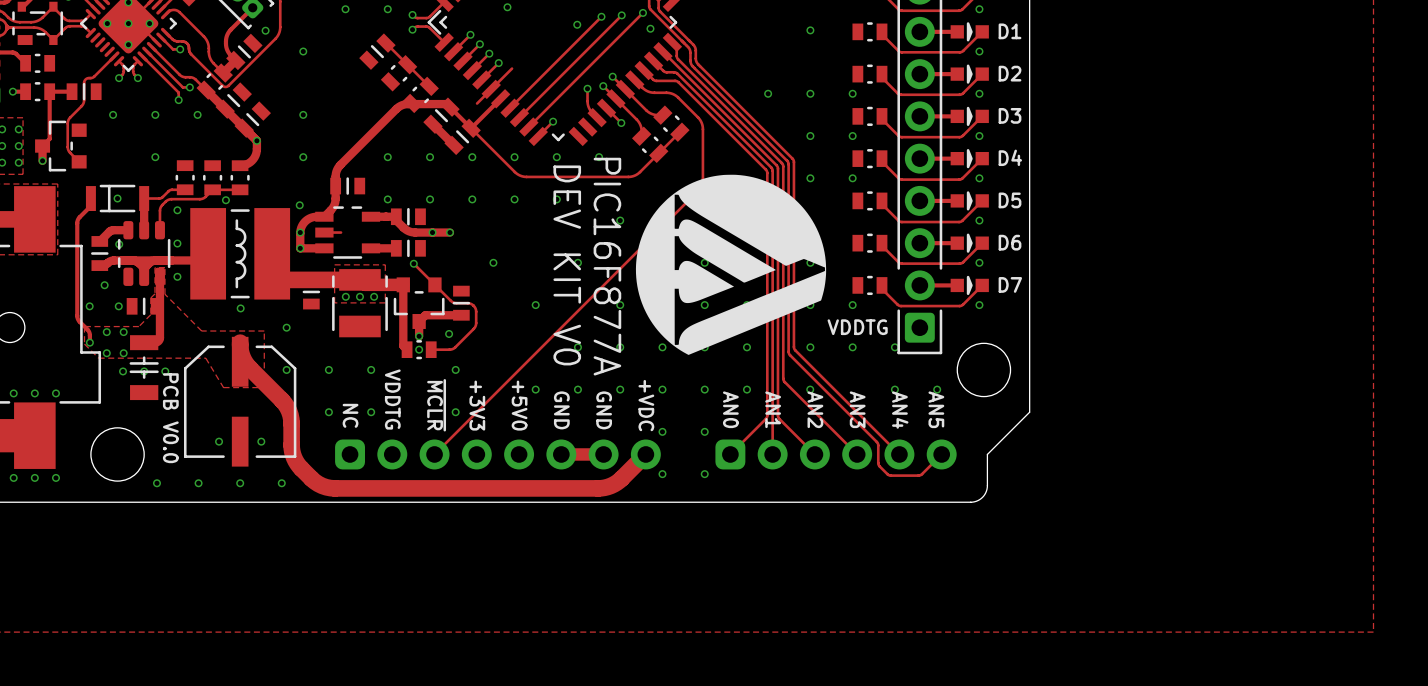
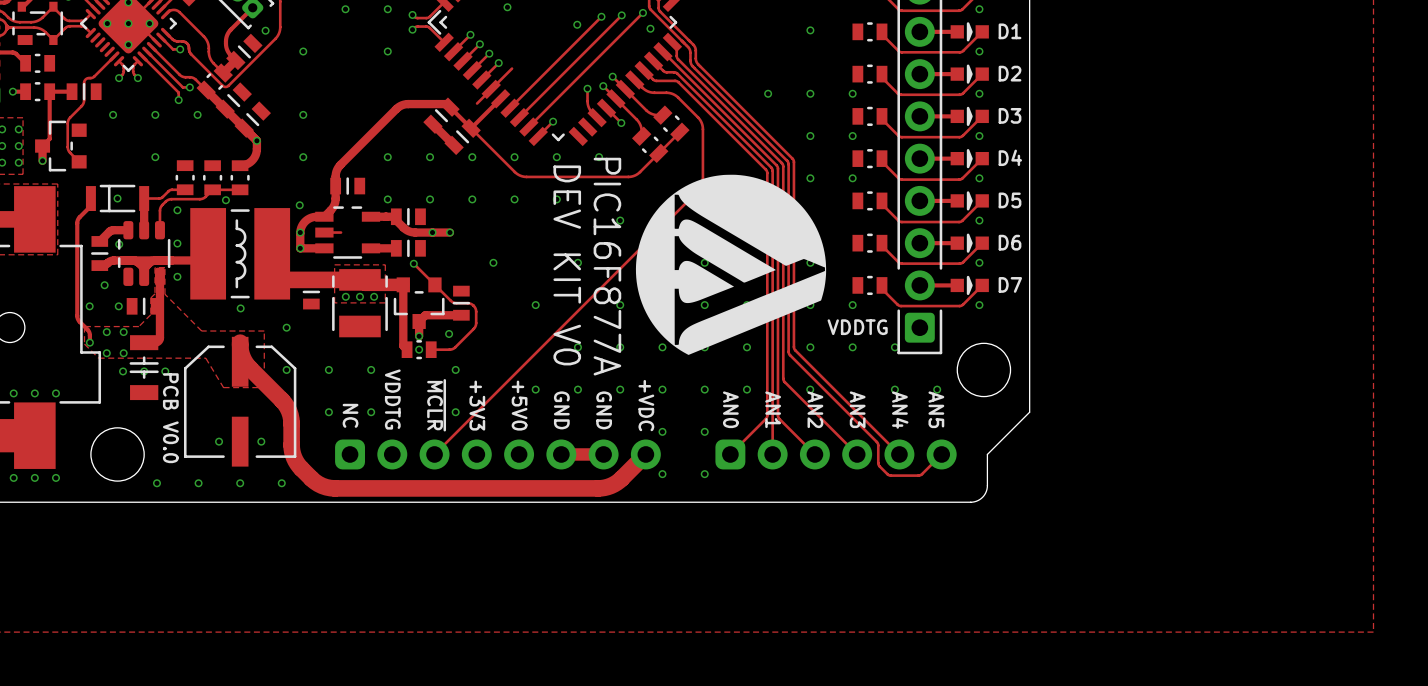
track: (385, 43) (429, 86) -> none
part: (377, 51) -> none
via: none -> (387, 51)
part: (399, 73) -> none
part: (420, 94) -> none

